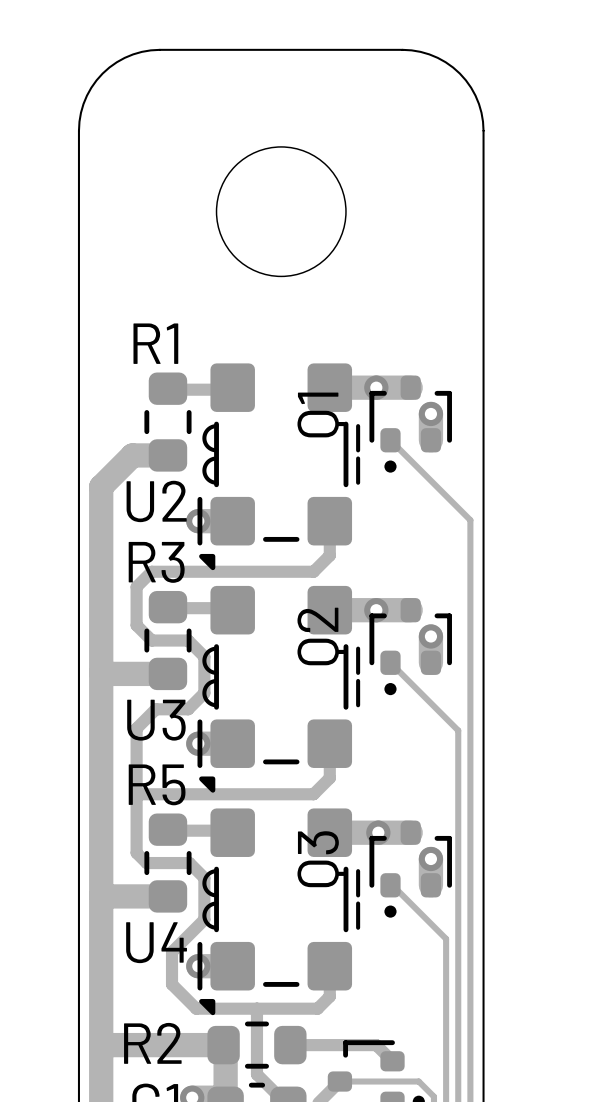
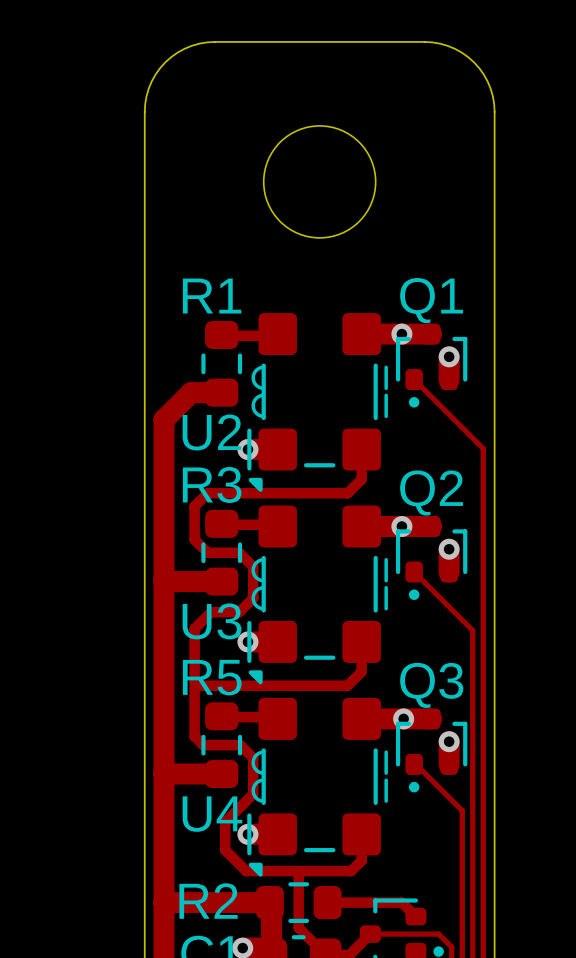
Q1 name rotation: 0° (321, 414) -> 90° clockwise (431, 300)
Q1 name position: Q1 (321, 414) -> Q1 (431, 300)
Q2 name rotation: 0° (321, 636) -> 90° clockwise (431, 493)
Q2 name position: Q2 (321, 636) -> Q2 (431, 493)
Q3 name rotation: 0° (321, 859) -> 90° clockwise (431, 685)
Q3 name position: Q3 (321, 859) -> Q3 (431, 685)

